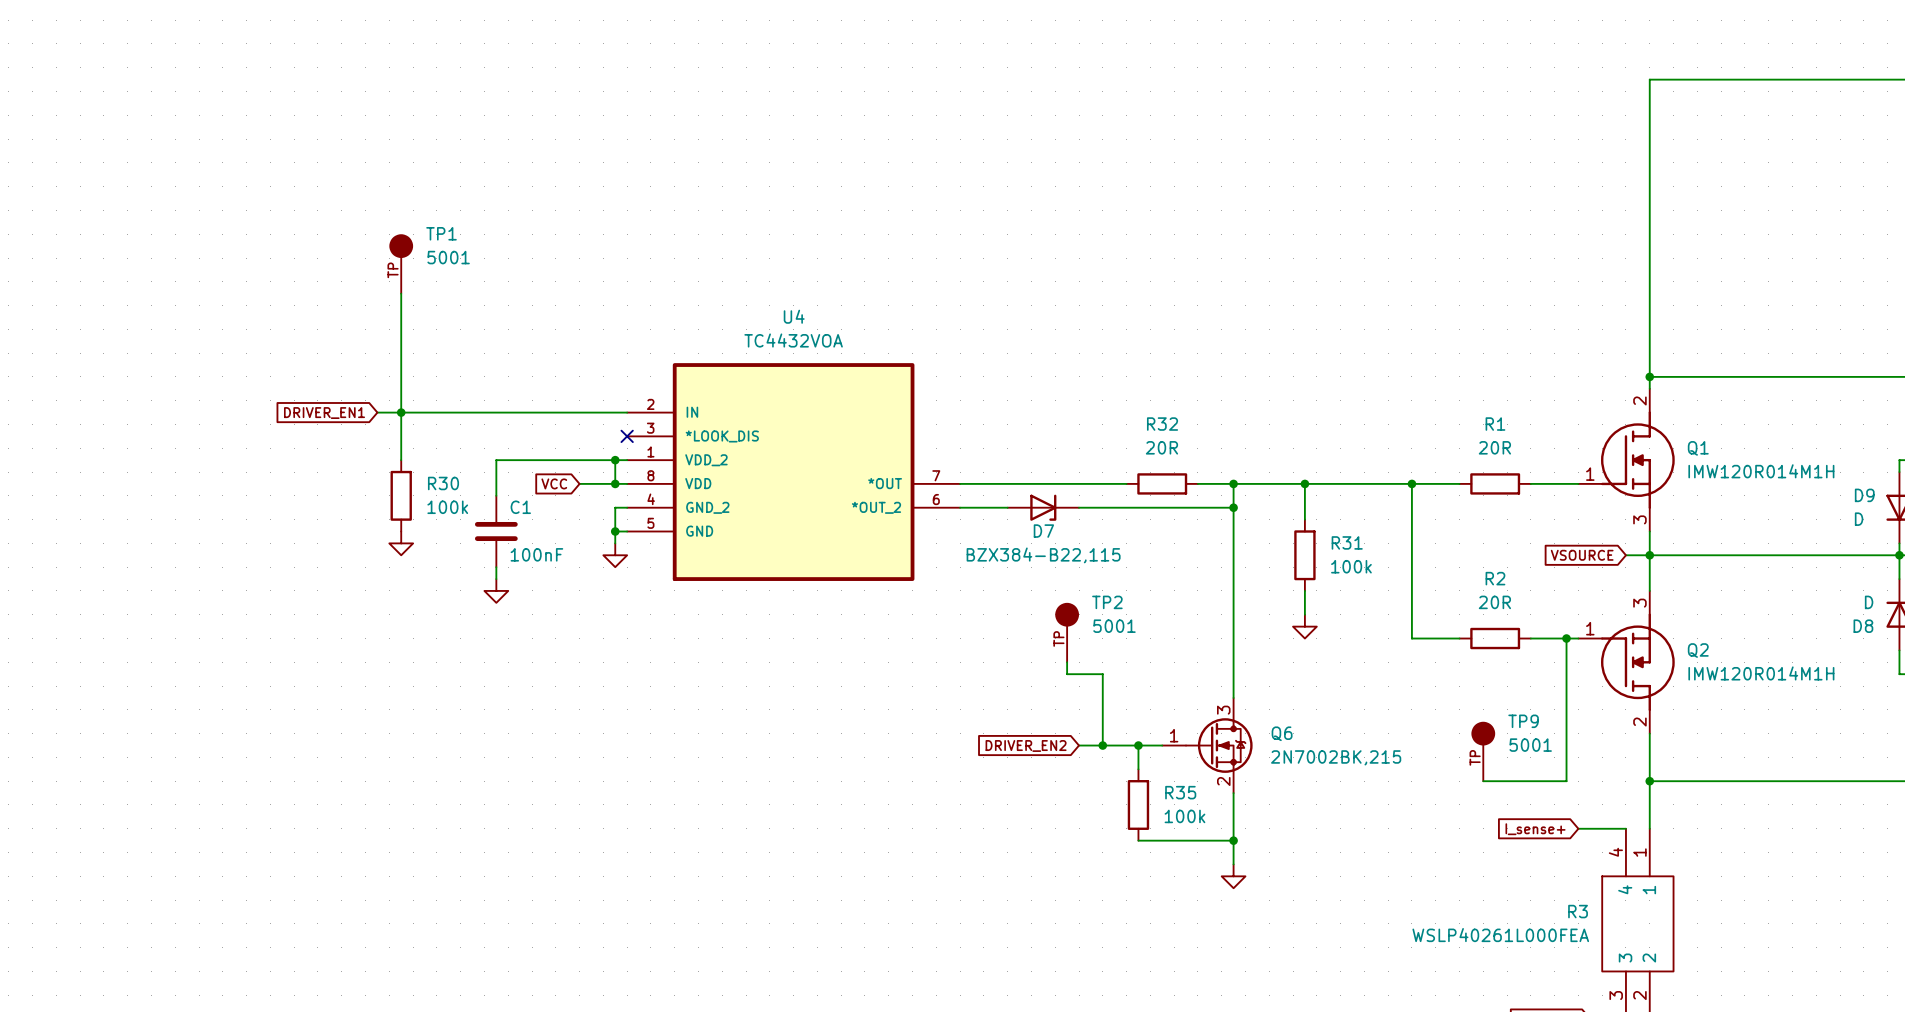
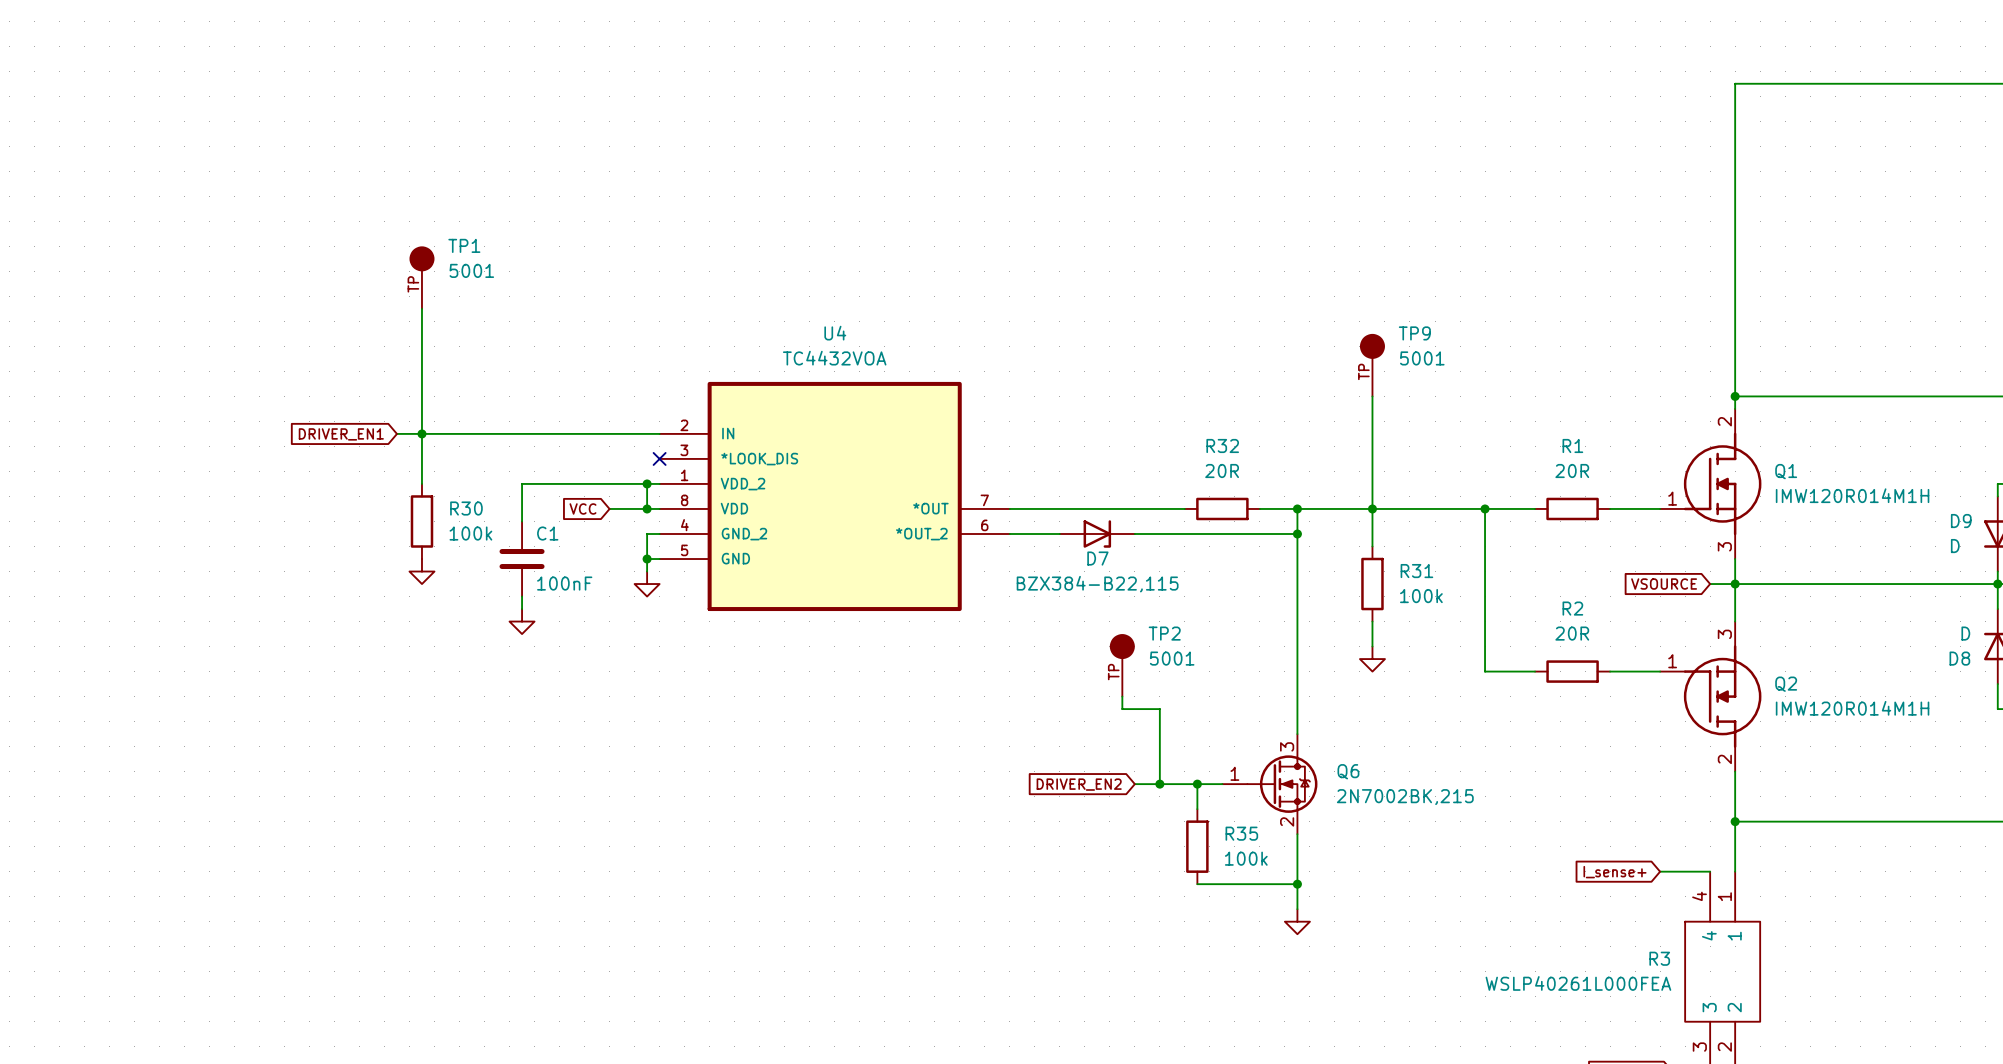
wire: none -> (1372, 396) (1372, 508)
wire: (1566, 638) (1566, 781) (1483, 781) -> none
junction: (1566, 638) -> none
TP9 position: (1483, 751) -> (1372, 365)

